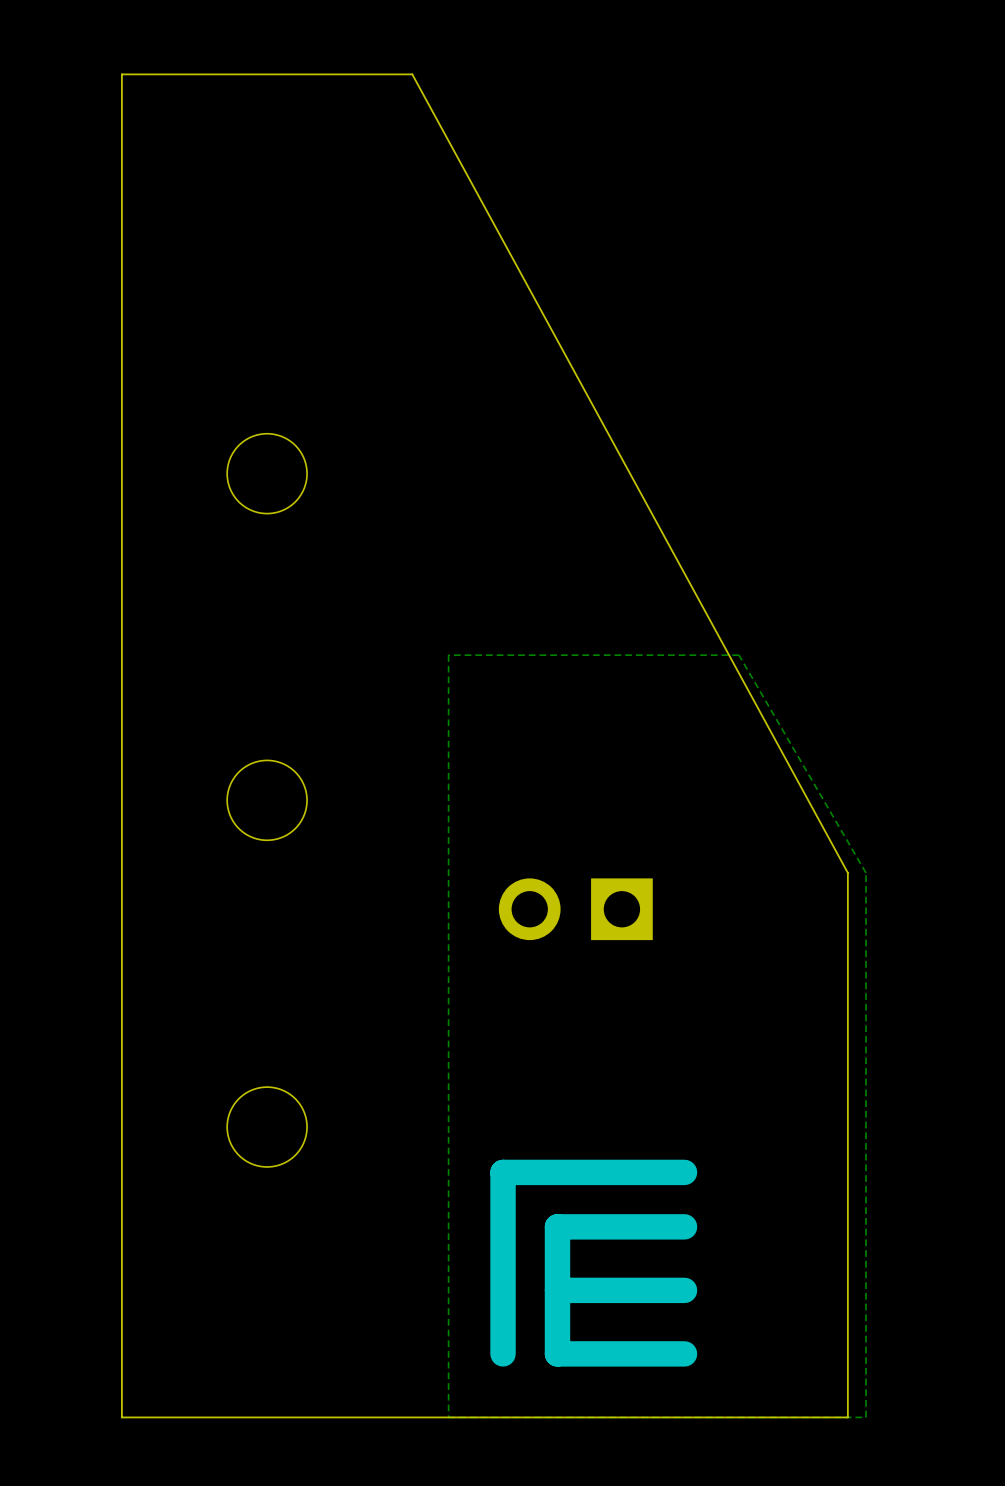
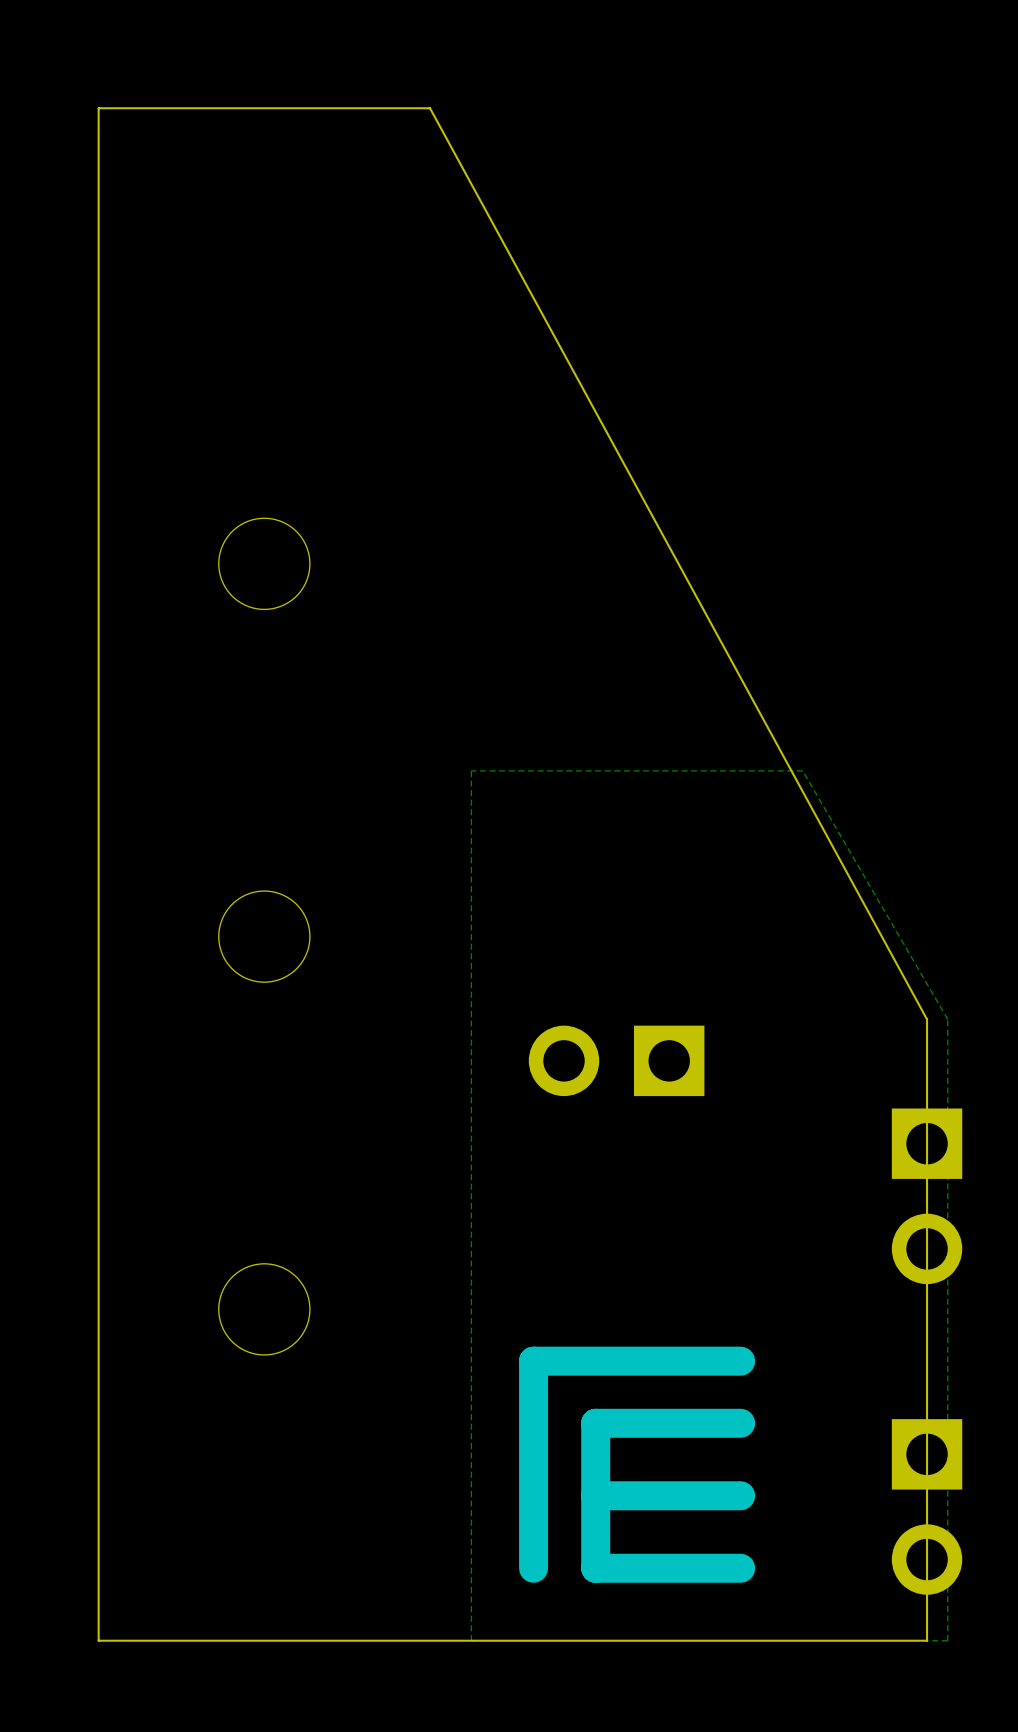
part: none -> (927, 1196)
part: none -> (927, 1506)

